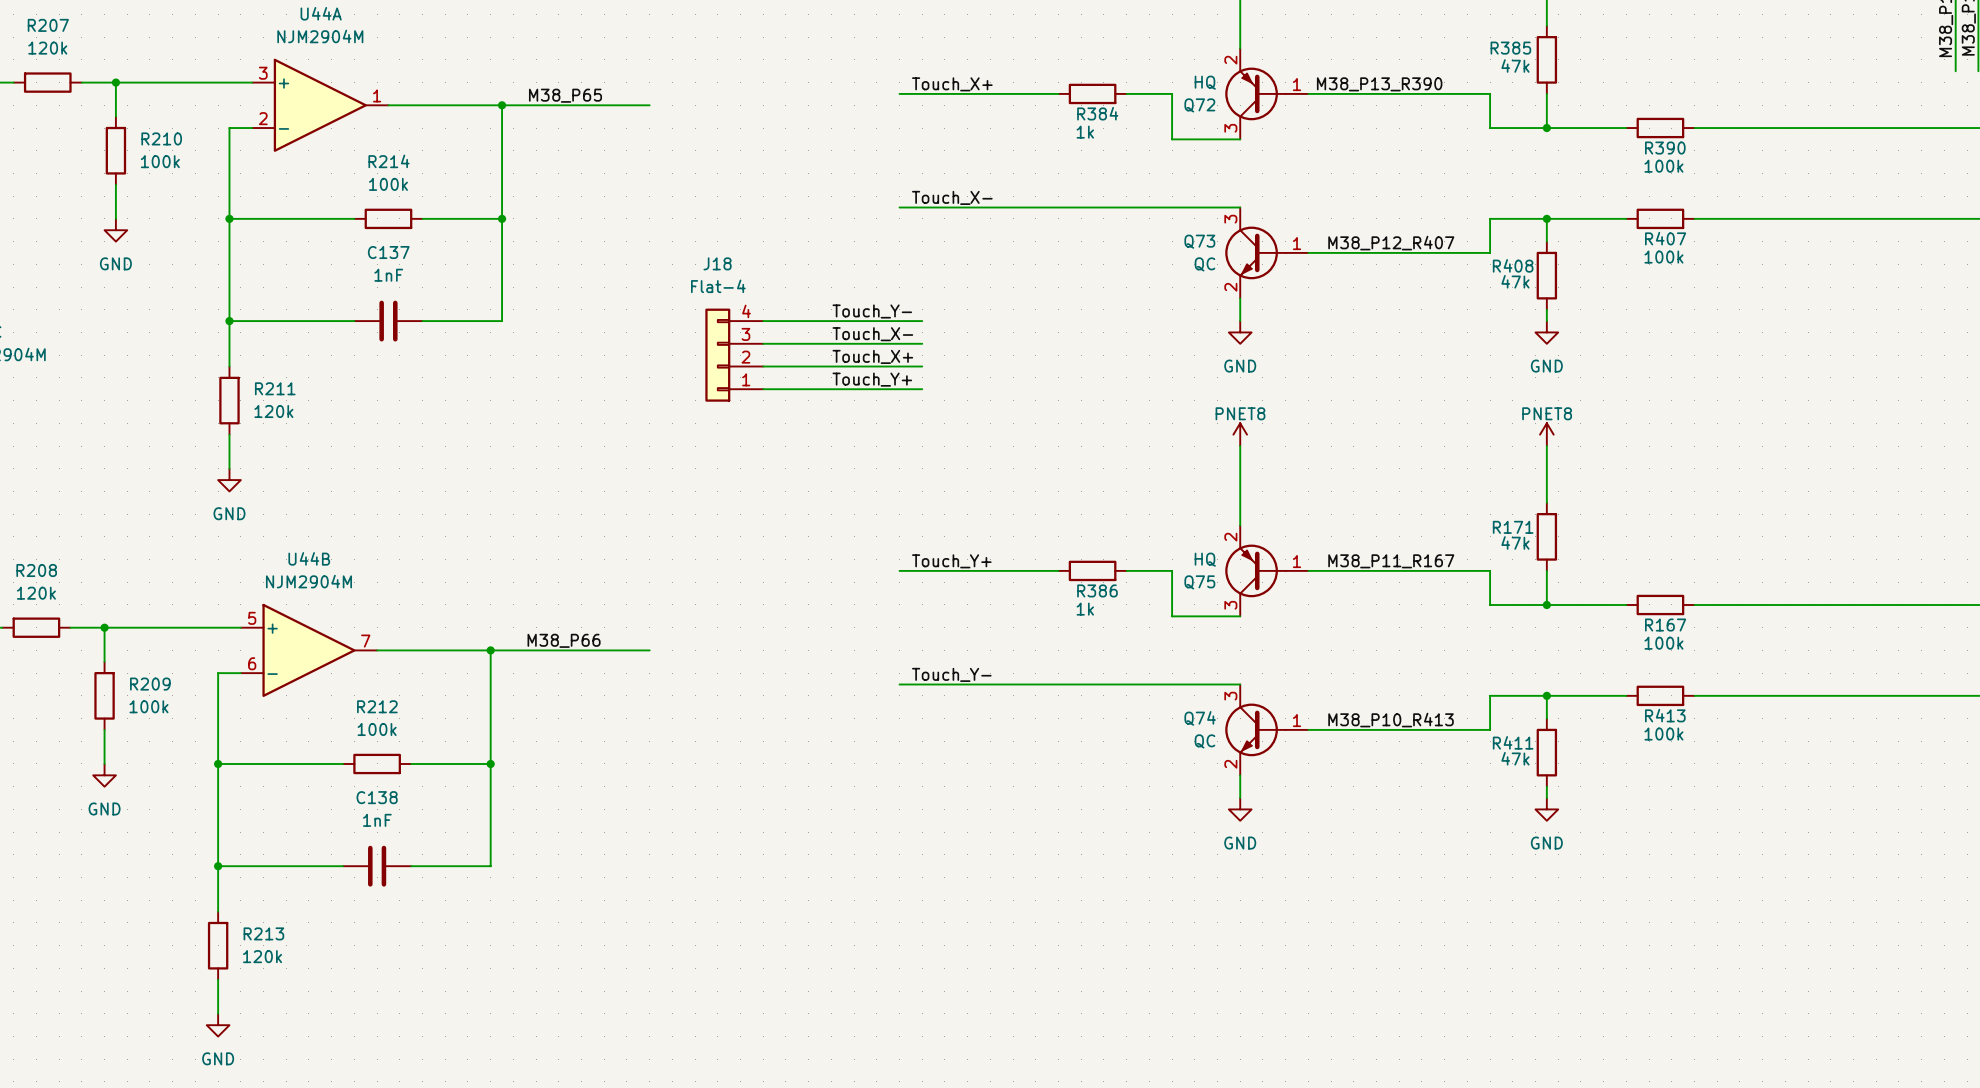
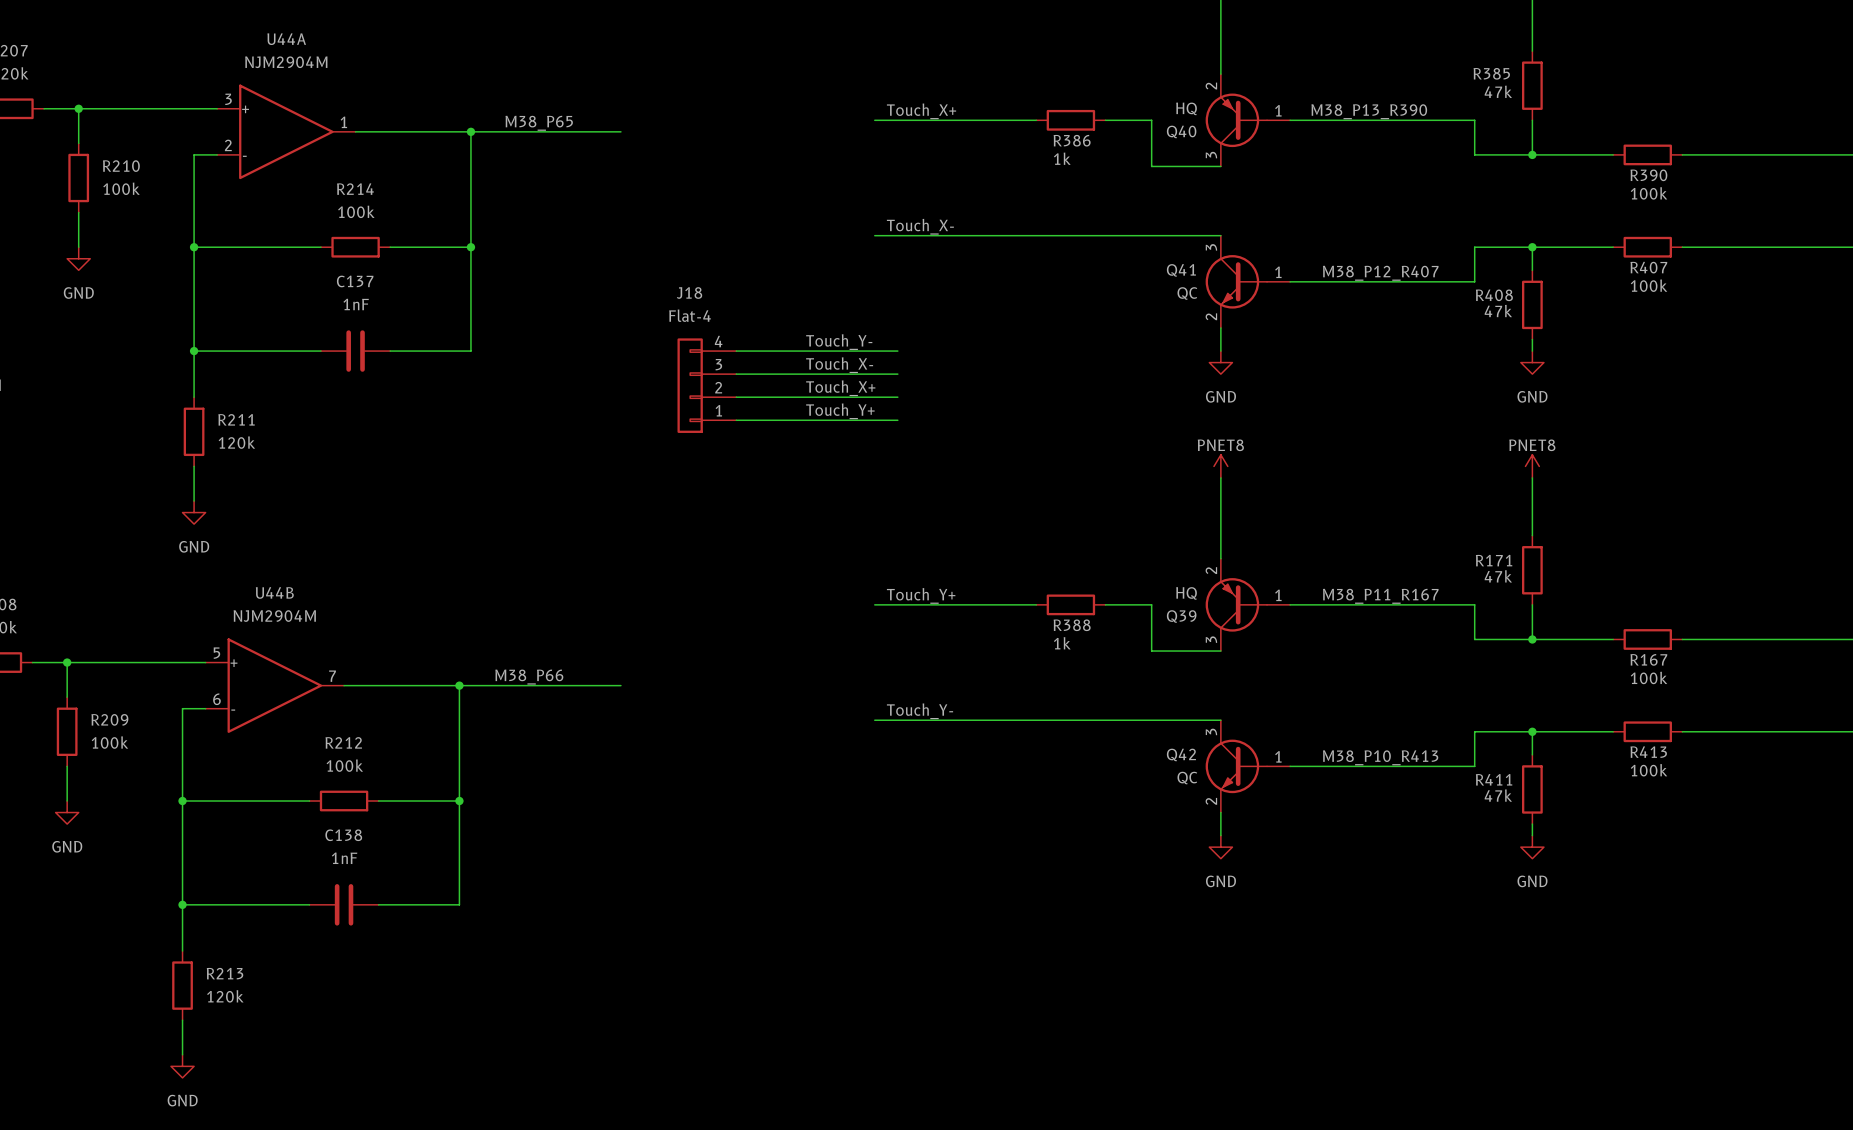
Q72 name: Q72 (1199, 105) -> Q40 (1181, 131)
R384 name: R384 (1097, 113) -> R386 (1072, 140)
Q73 name: Q73 (1199, 241) -> Q41 (1181, 270)
Q75 name: Q75 (1199, 582) -> Q39 (1181, 616)
R386 name: R386 (1097, 590) -> R388 (1072, 625)
Q74 name: Q74 (1200, 718) -> Q42 (1181, 754)

